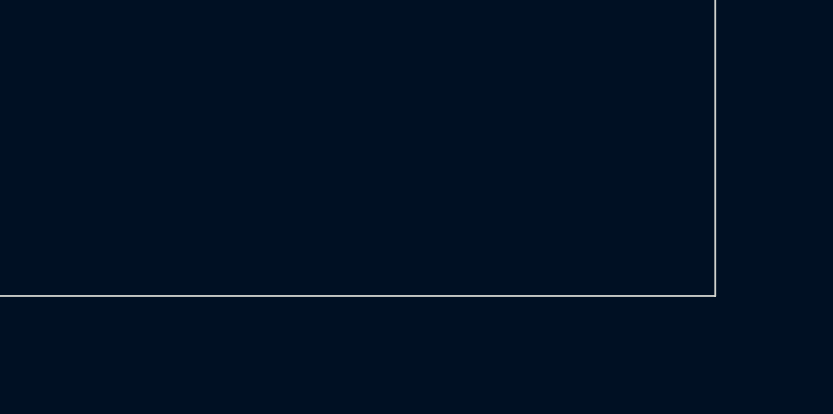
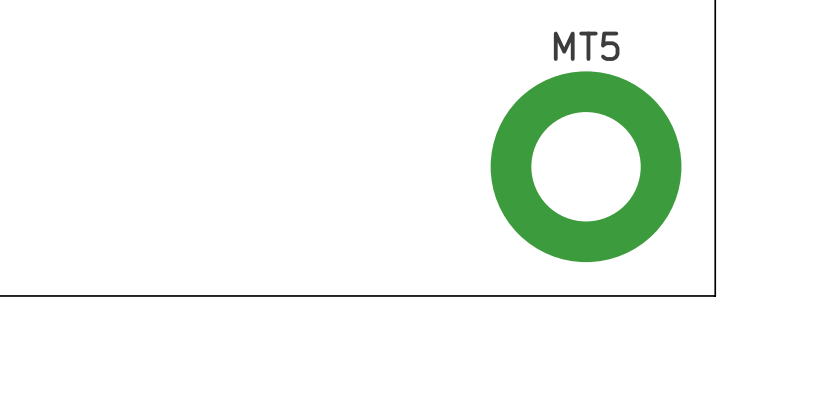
MT5: none -> (586, 166)

